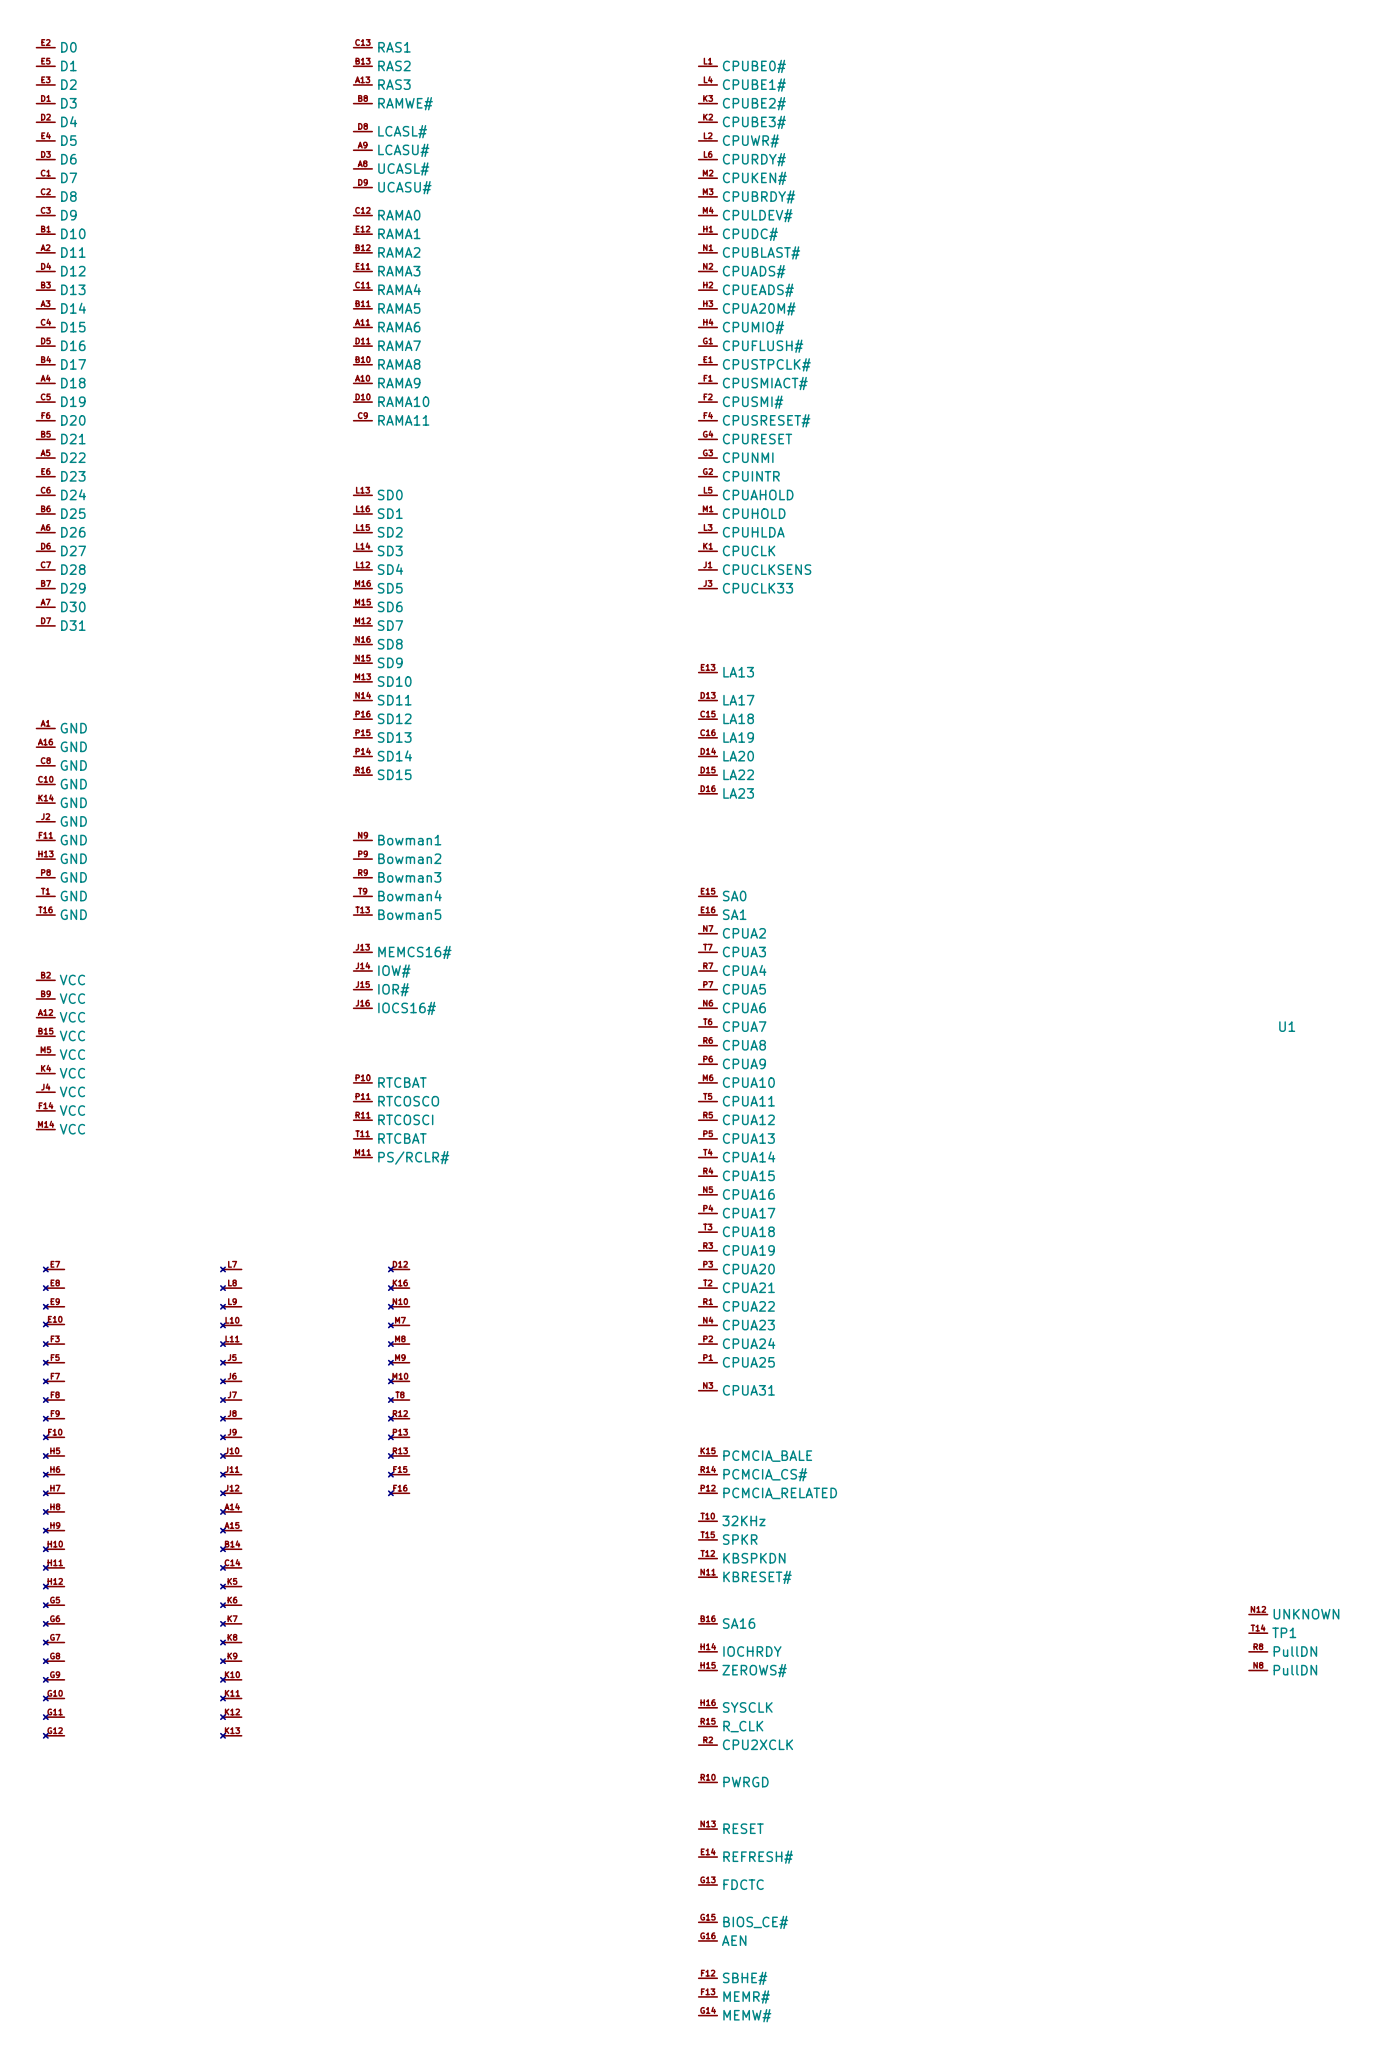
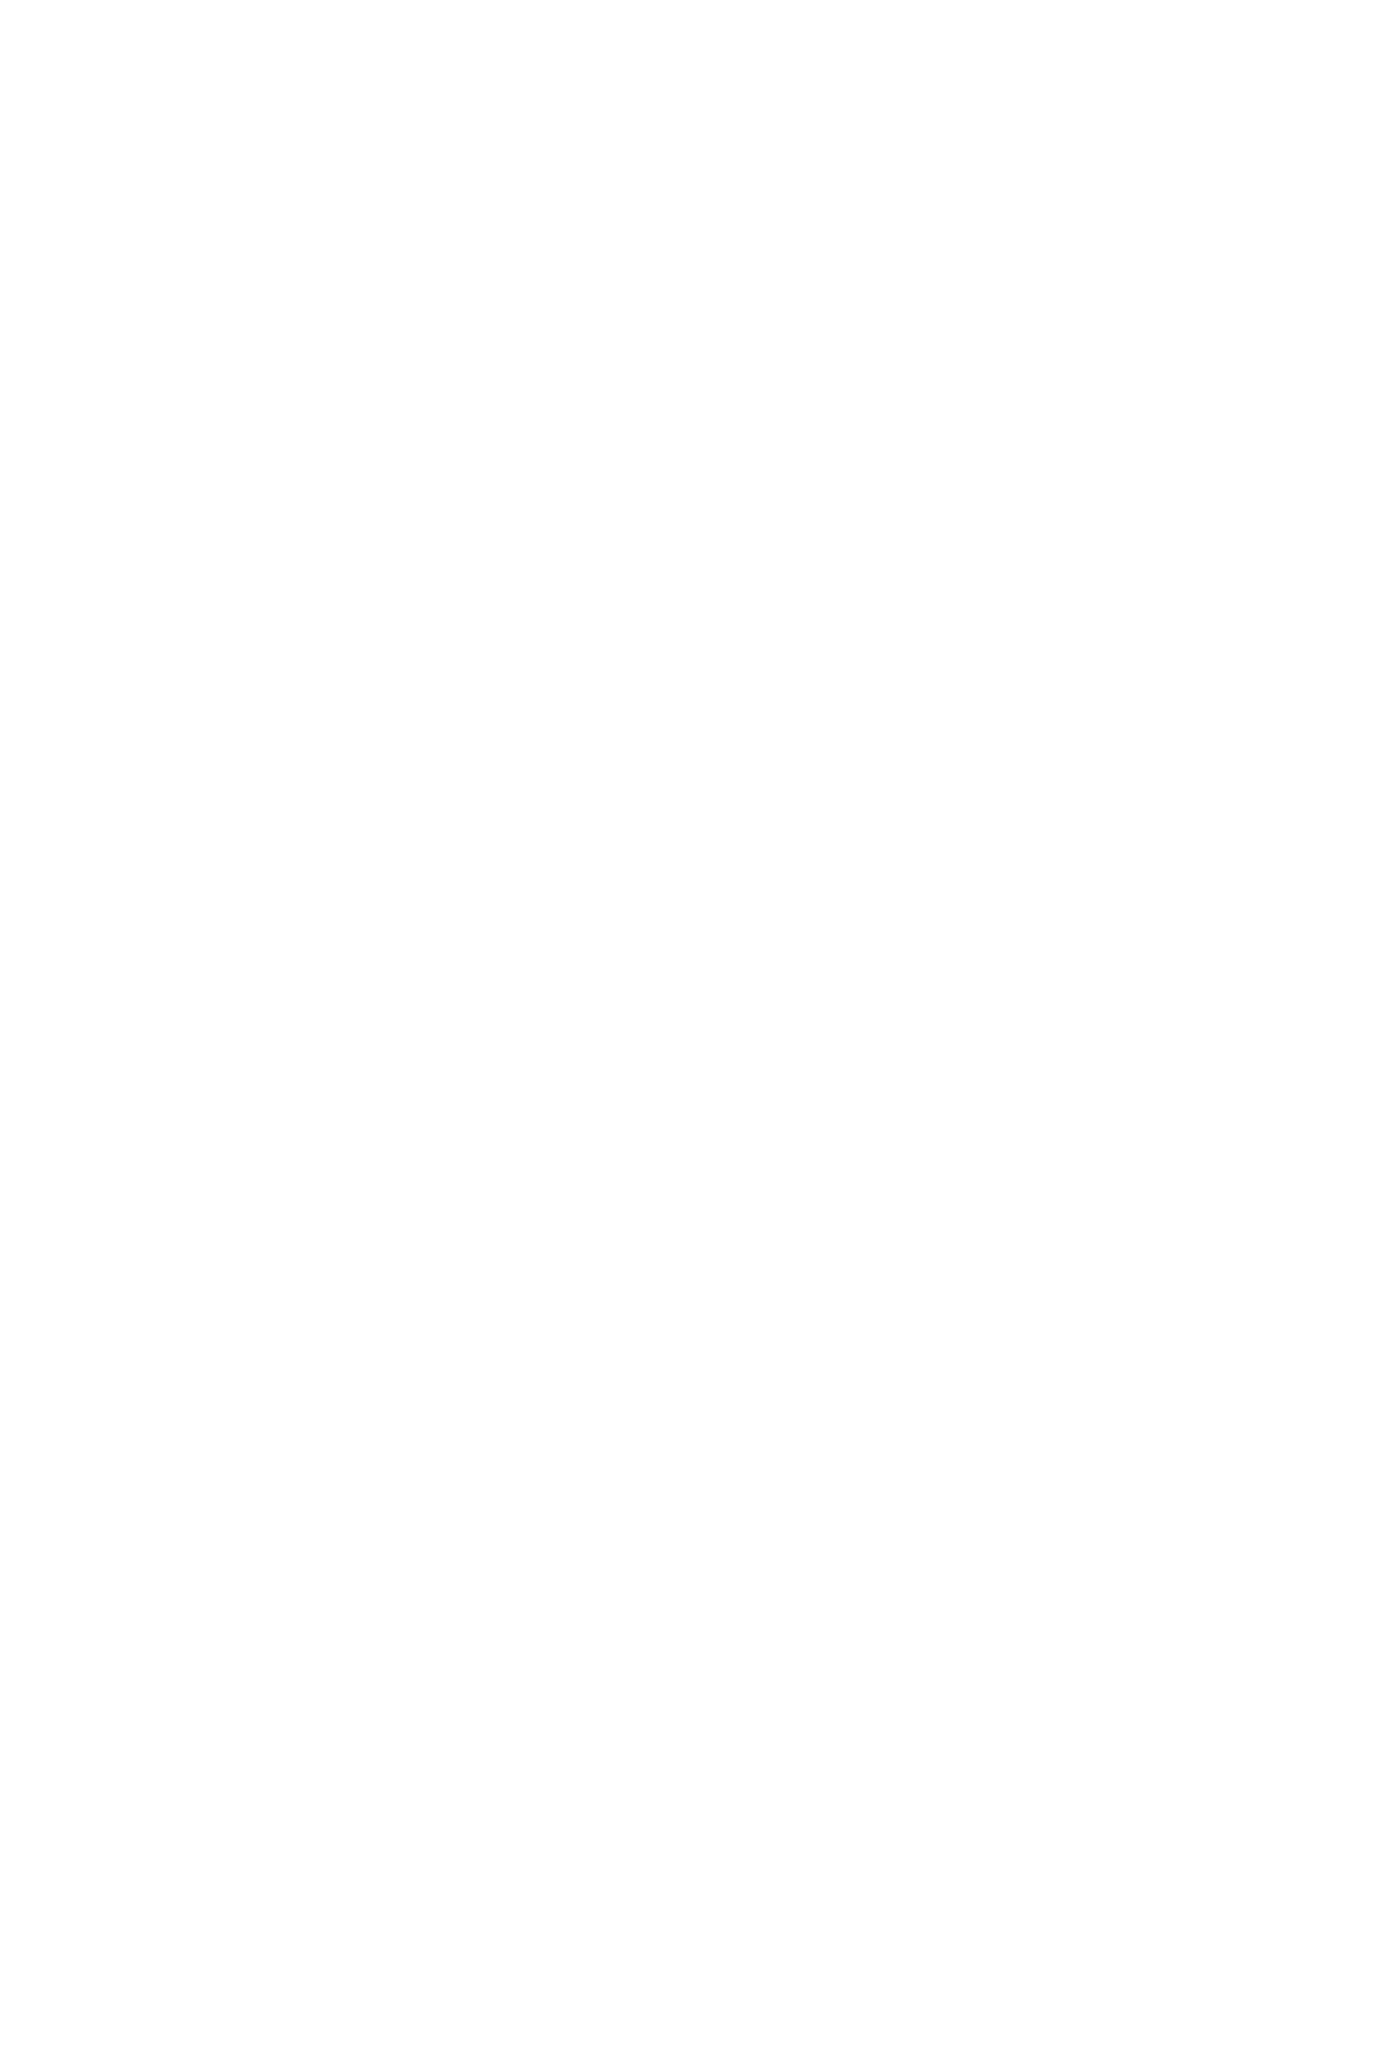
U1: (652, 1031) -> none

